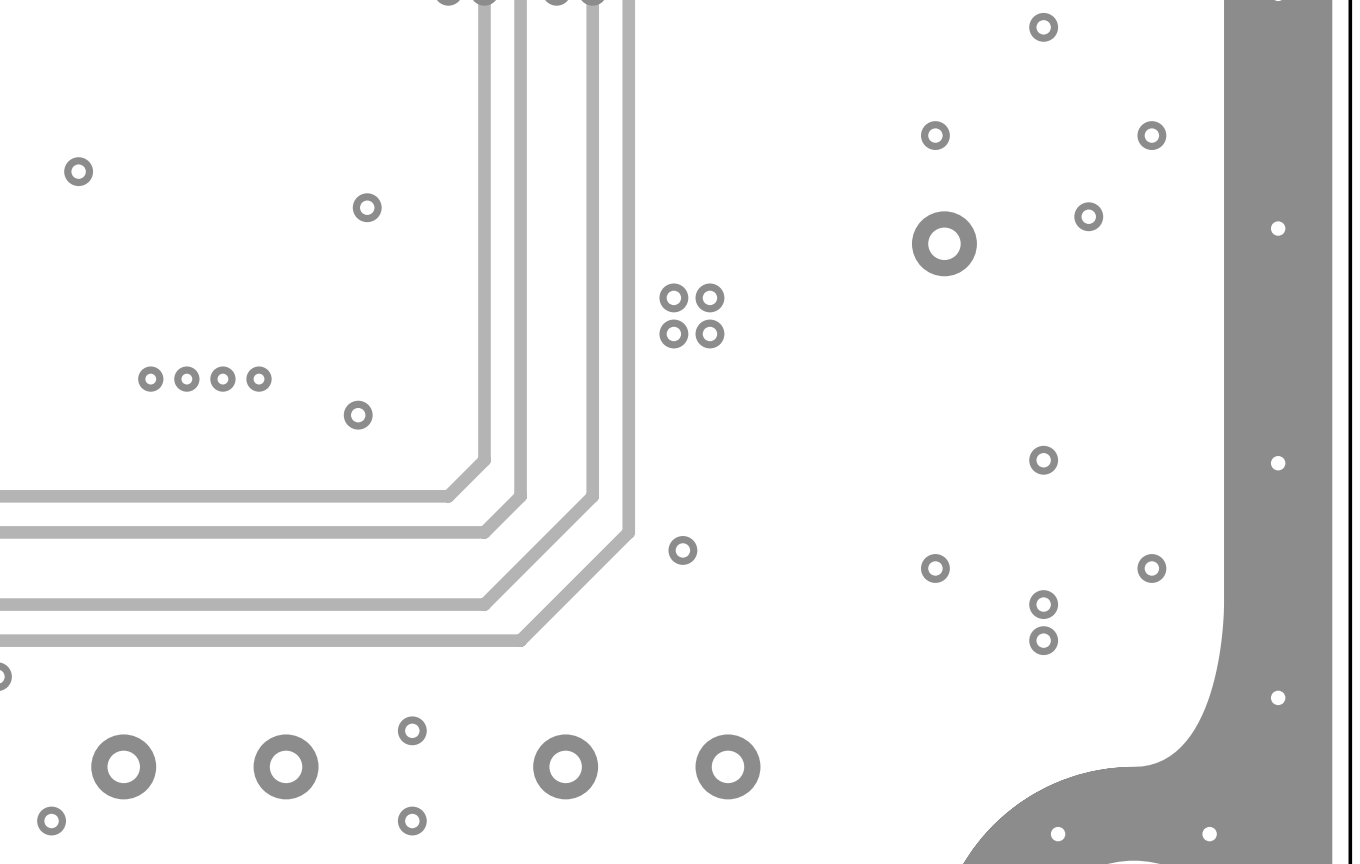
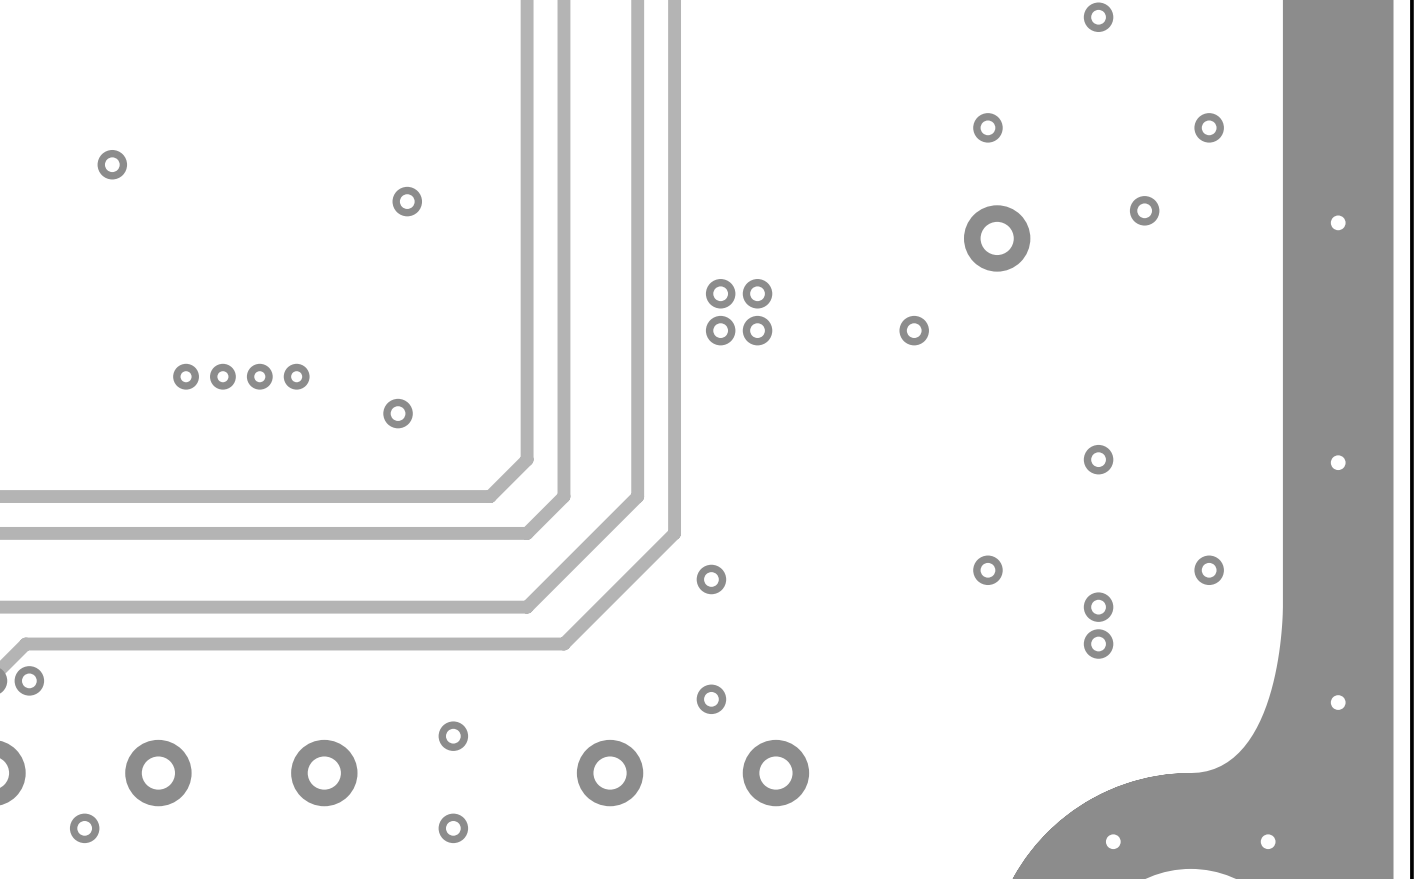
via: none -> (914, 330)
via position: (682, 550) -> (711, 579)
via: none -> (711, 699)

